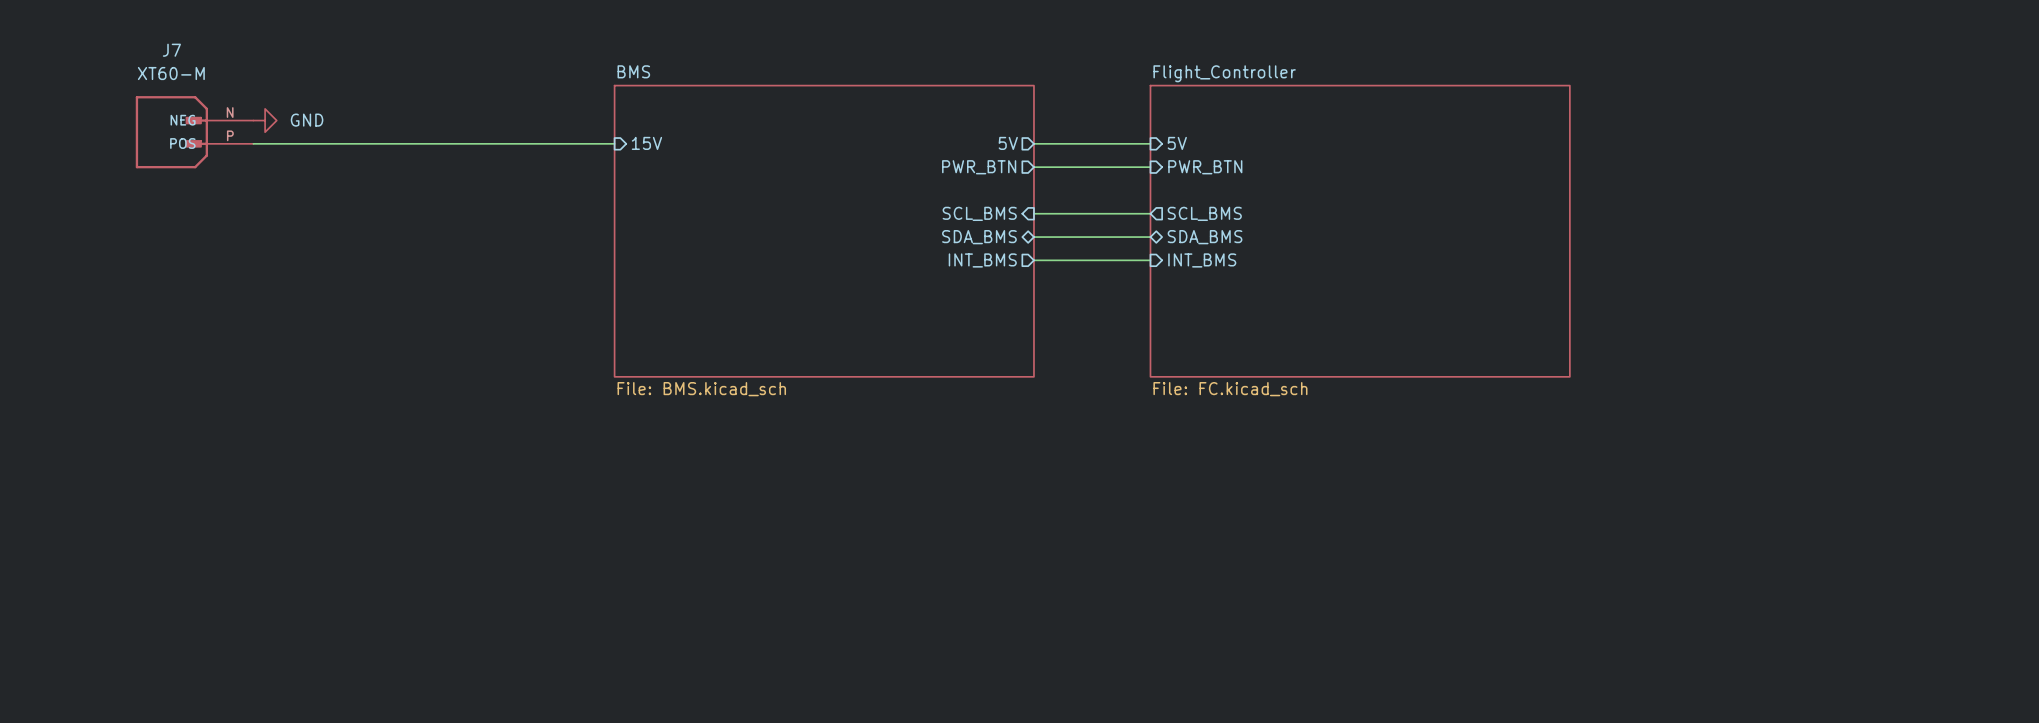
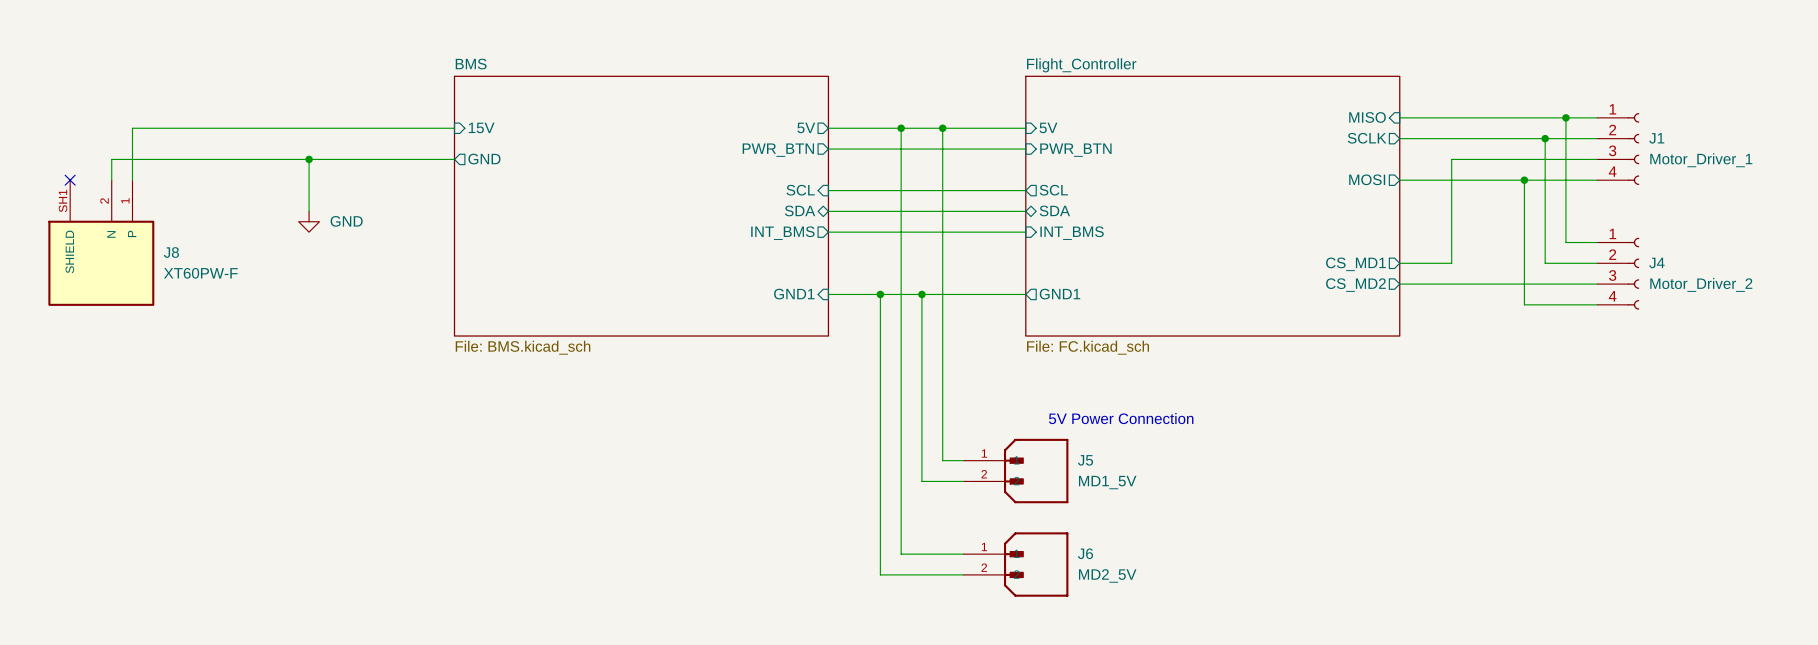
power symbol rotation: 0° (265, 120) -> 90° clockwise (309, 221)
power symbol position: GND (265, 120) -> GND (309, 221)
sheet pin: none -> MISO (1367, 117)
J7: XT60-M (194, 132) -> none
wire: none -> (1399, 117) (1597, 117)
wire: none -> (1565, 117) (1565, 242) (1597, 242)
junction: none -> (1565, 117)
wire: none -> (225, 128) (132, 128) (132, 180)
wire: (509, 143) (614, 143) -> none
sheet pin position: 15V (646, 143) -> 15V (481, 127)
wire: none -> (828, 128) (921, 128)
sheet pin position: 5V (1008, 143) -> 5V (806, 127)
wire: none -> (901, 128) (901, 554) (963, 554)
junction: none -> (901, 128)
wire: none -> (942, 128) (942, 460) (963, 460)
junction: none -> (942, 128)
sheet pin: none -> SCLK (1367, 138)
wire: none -> (1399, 138) (1597, 138)
wire: none -> (1545, 138) (1545, 263) (1597, 263)
junction: none -> (1545, 138)
wire: none -> (828, 149) (921, 149)
sheet pin position: PWR_BTN (979, 167) -> PWR_BTN (778, 150)
J1: none -> Motor_Driver_1 (1618, 149)
wire: none -> (309, 159) (309, 211)
junction: none -> (309, 159)
wire: none -> (454, 159) (111, 159) (111, 180)
sheet pin: none -> GND (484, 159)
wire: none -> (1597, 159) (1451, 159) (1451, 263) (1399, 263)
sheet pin: none -> MOSI (1367, 179)
no-connect mark: none -> (70, 180)
wire: none -> (1399, 180) (1597, 180)
wire: none -> (1524, 180) (1524, 304) (1597, 304)
junction: none -> (1524, 180)
sheet pin: none -> SCL (800, 190)
wire: none -> (828, 190) (921, 190)
sheet pin: SCL_BMS (979, 213) -> none
sheet pin: SCL_BMS (1204, 213) -> SCL (1053, 190)
sheet BMS position: (824, 231) -> (641, 206)
sheet pin: none -> SDA (800, 210)
wire: none -> (828, 211) (921, 211)
sheet pin: SDA_BMS (979, 237) -> none
sheet pin: SDA_BMS (1205, 237) -> SDA (1054, 210)
wire: none -> (828, 232) (921, 232)
sheet pin position: INT_BMS (982, 260) -> INT_BMS (782, 233)
J8: none -> XT60PW-F (101, 243)
sheet pin: none -> CS_MD1 (1355, 264)
J4: none -> Motor_Driver_2 (1618, 273)
sheet pin: none -> CS_MD2 (1355, 285)
wire: none -> (1399, 284) (1597, 284)
sheet pin: none -> GND1 (794, 294)
sheet pin: none -> GND1 (1059, 294)
wire: none -> (828, 294) (1025, 294)
wire: none -> (880, 294) (880, 574) (963, 574)
junction: none -> (880, 294)
wire: none -> (921, 294) (921, 481) (963, 481)
junction: none -> (921, 294)
text: none -> 5V Power Connection (1121, 418)
J5: none -> MD1_5V (1015, 471)
J6: none -> MD2_5V (1015, 564)

